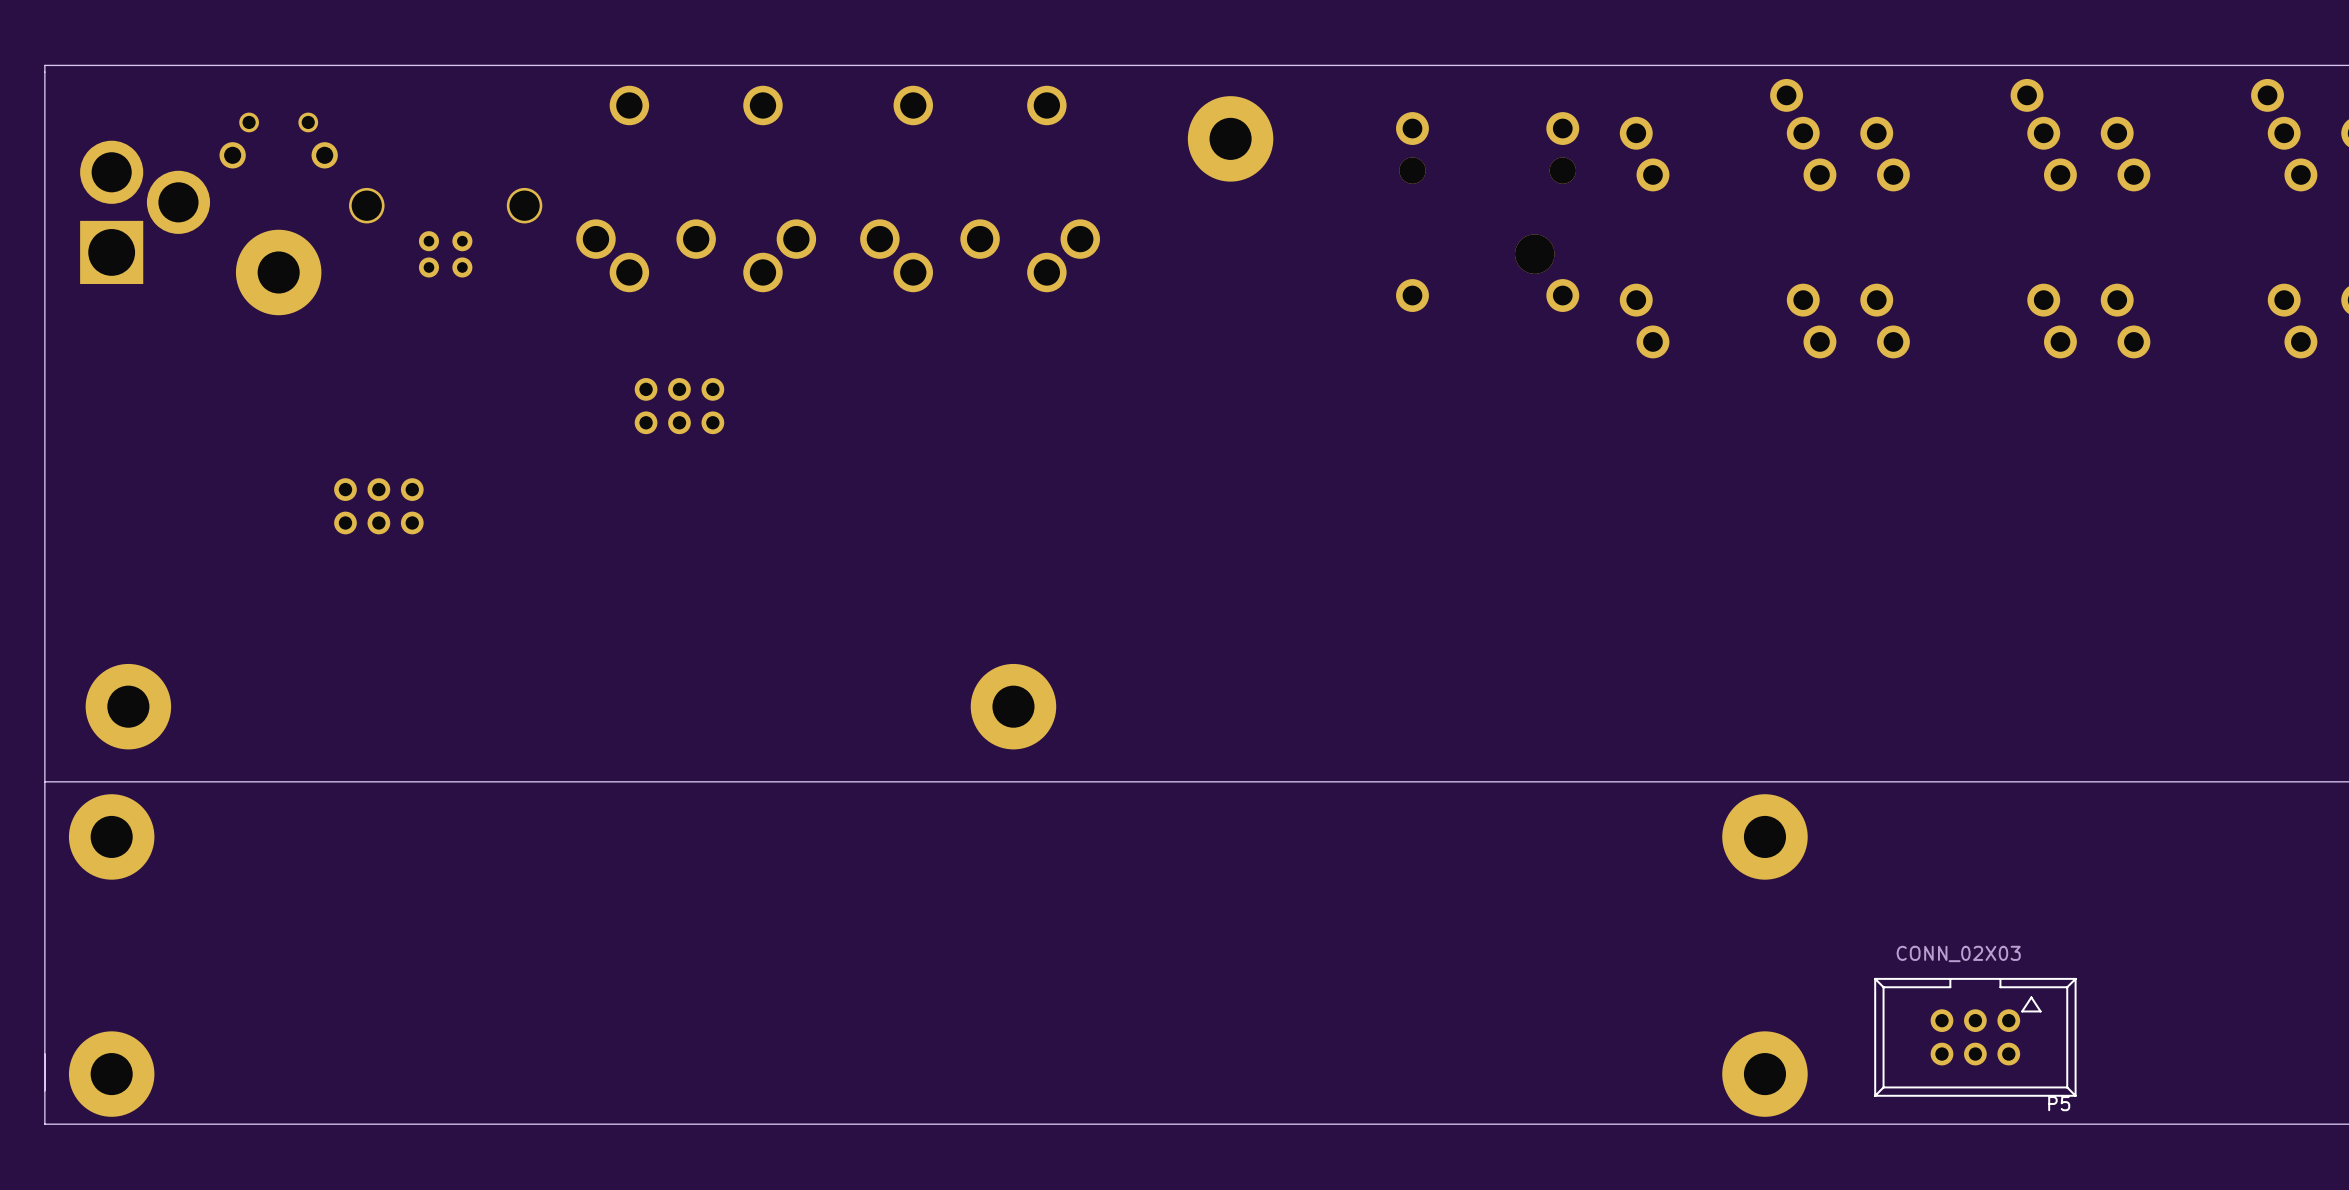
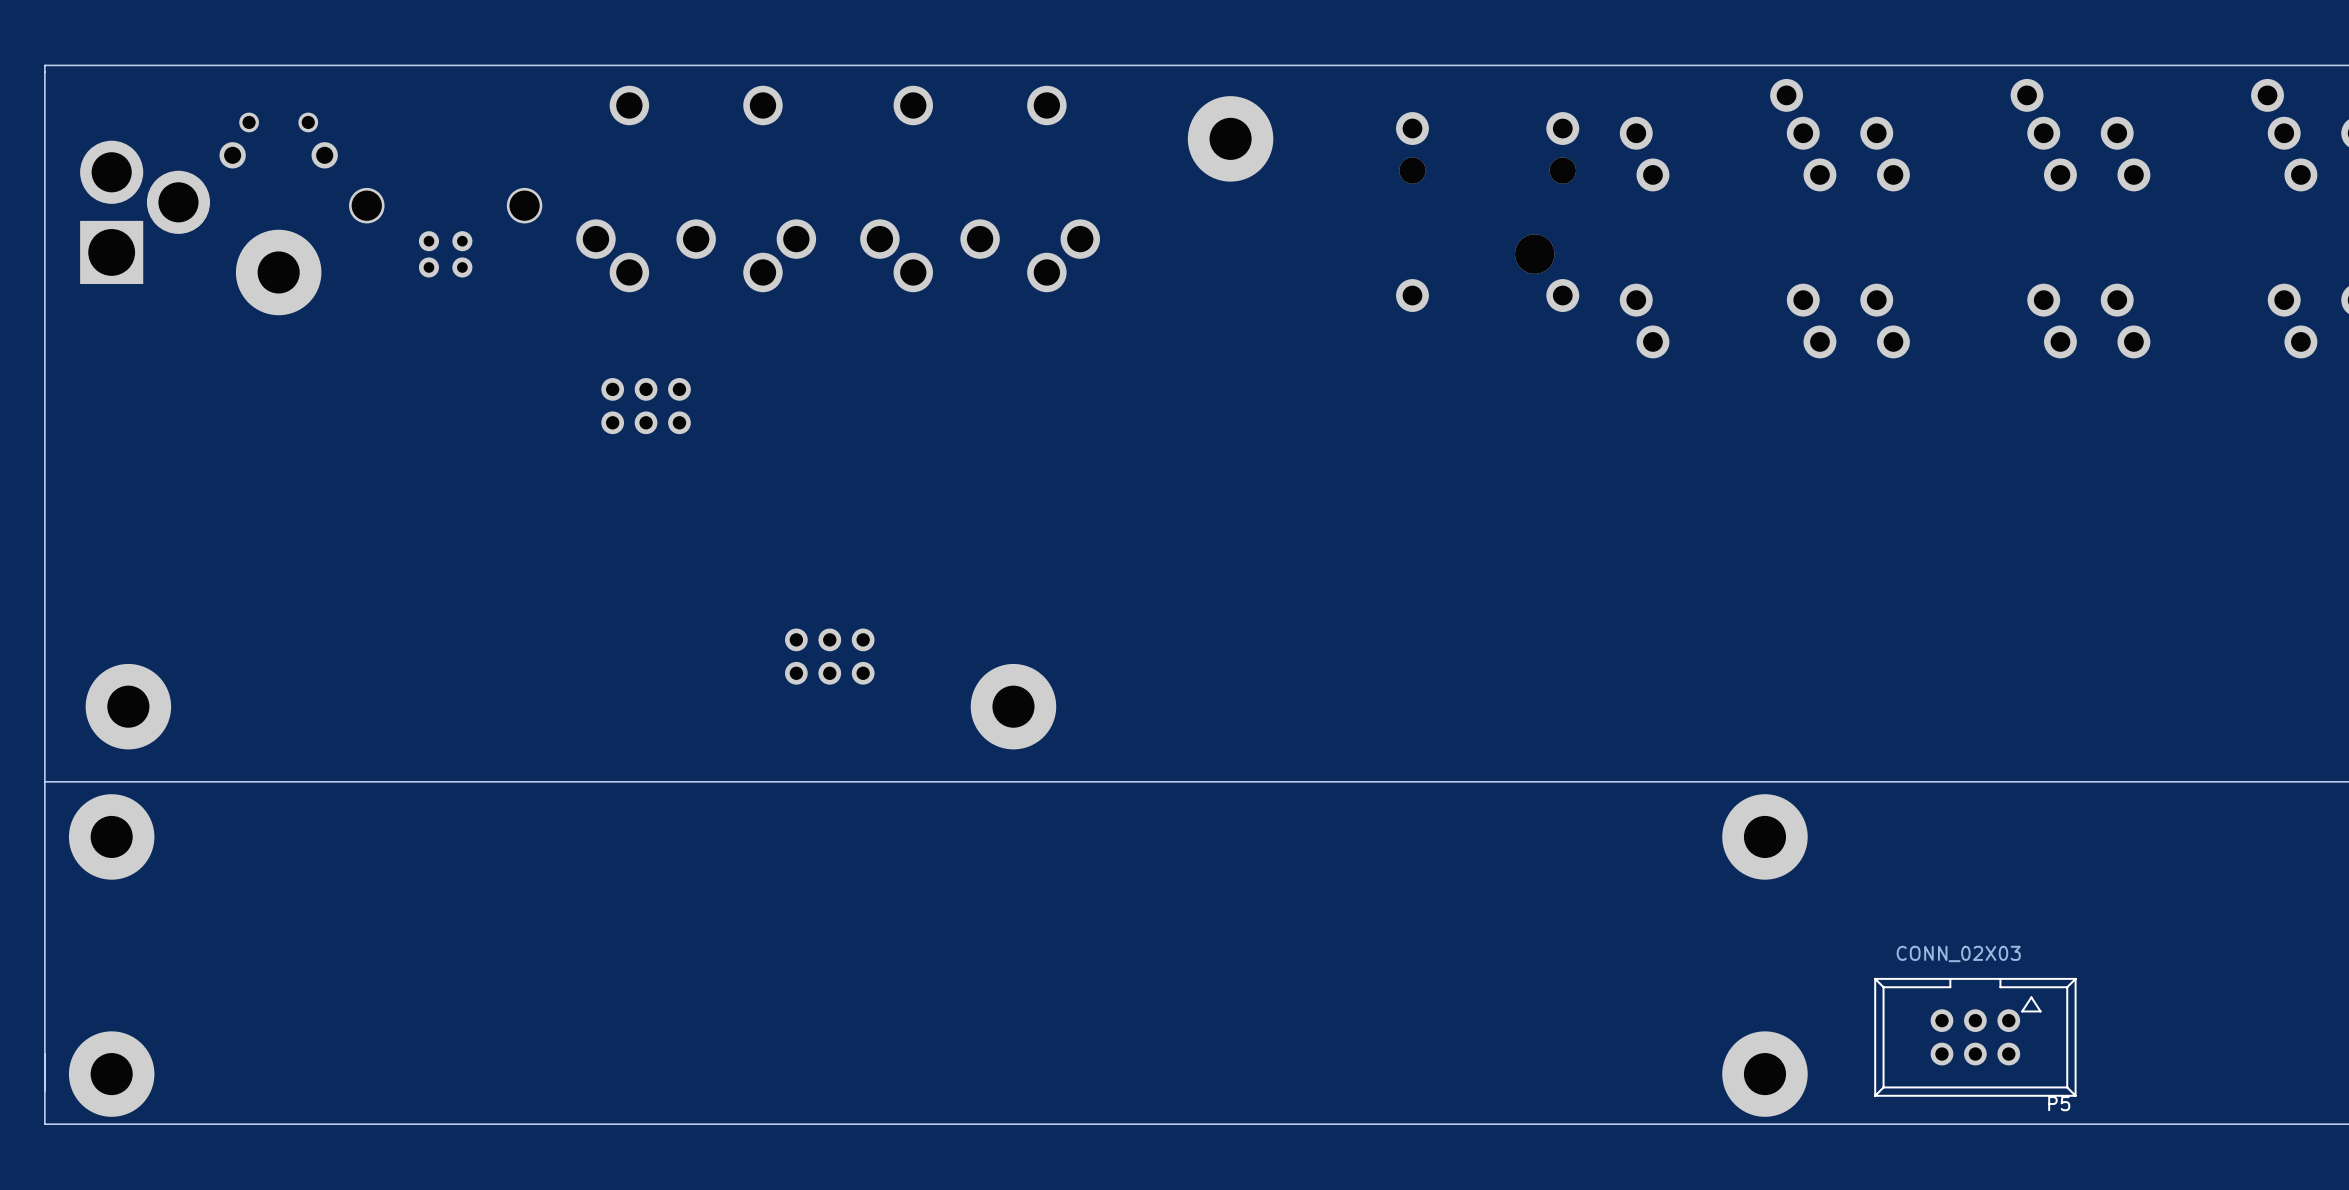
part position: (679, 406) -> (646, 406)
part: (378, 506) -> none
part: none -> (829, 656)

